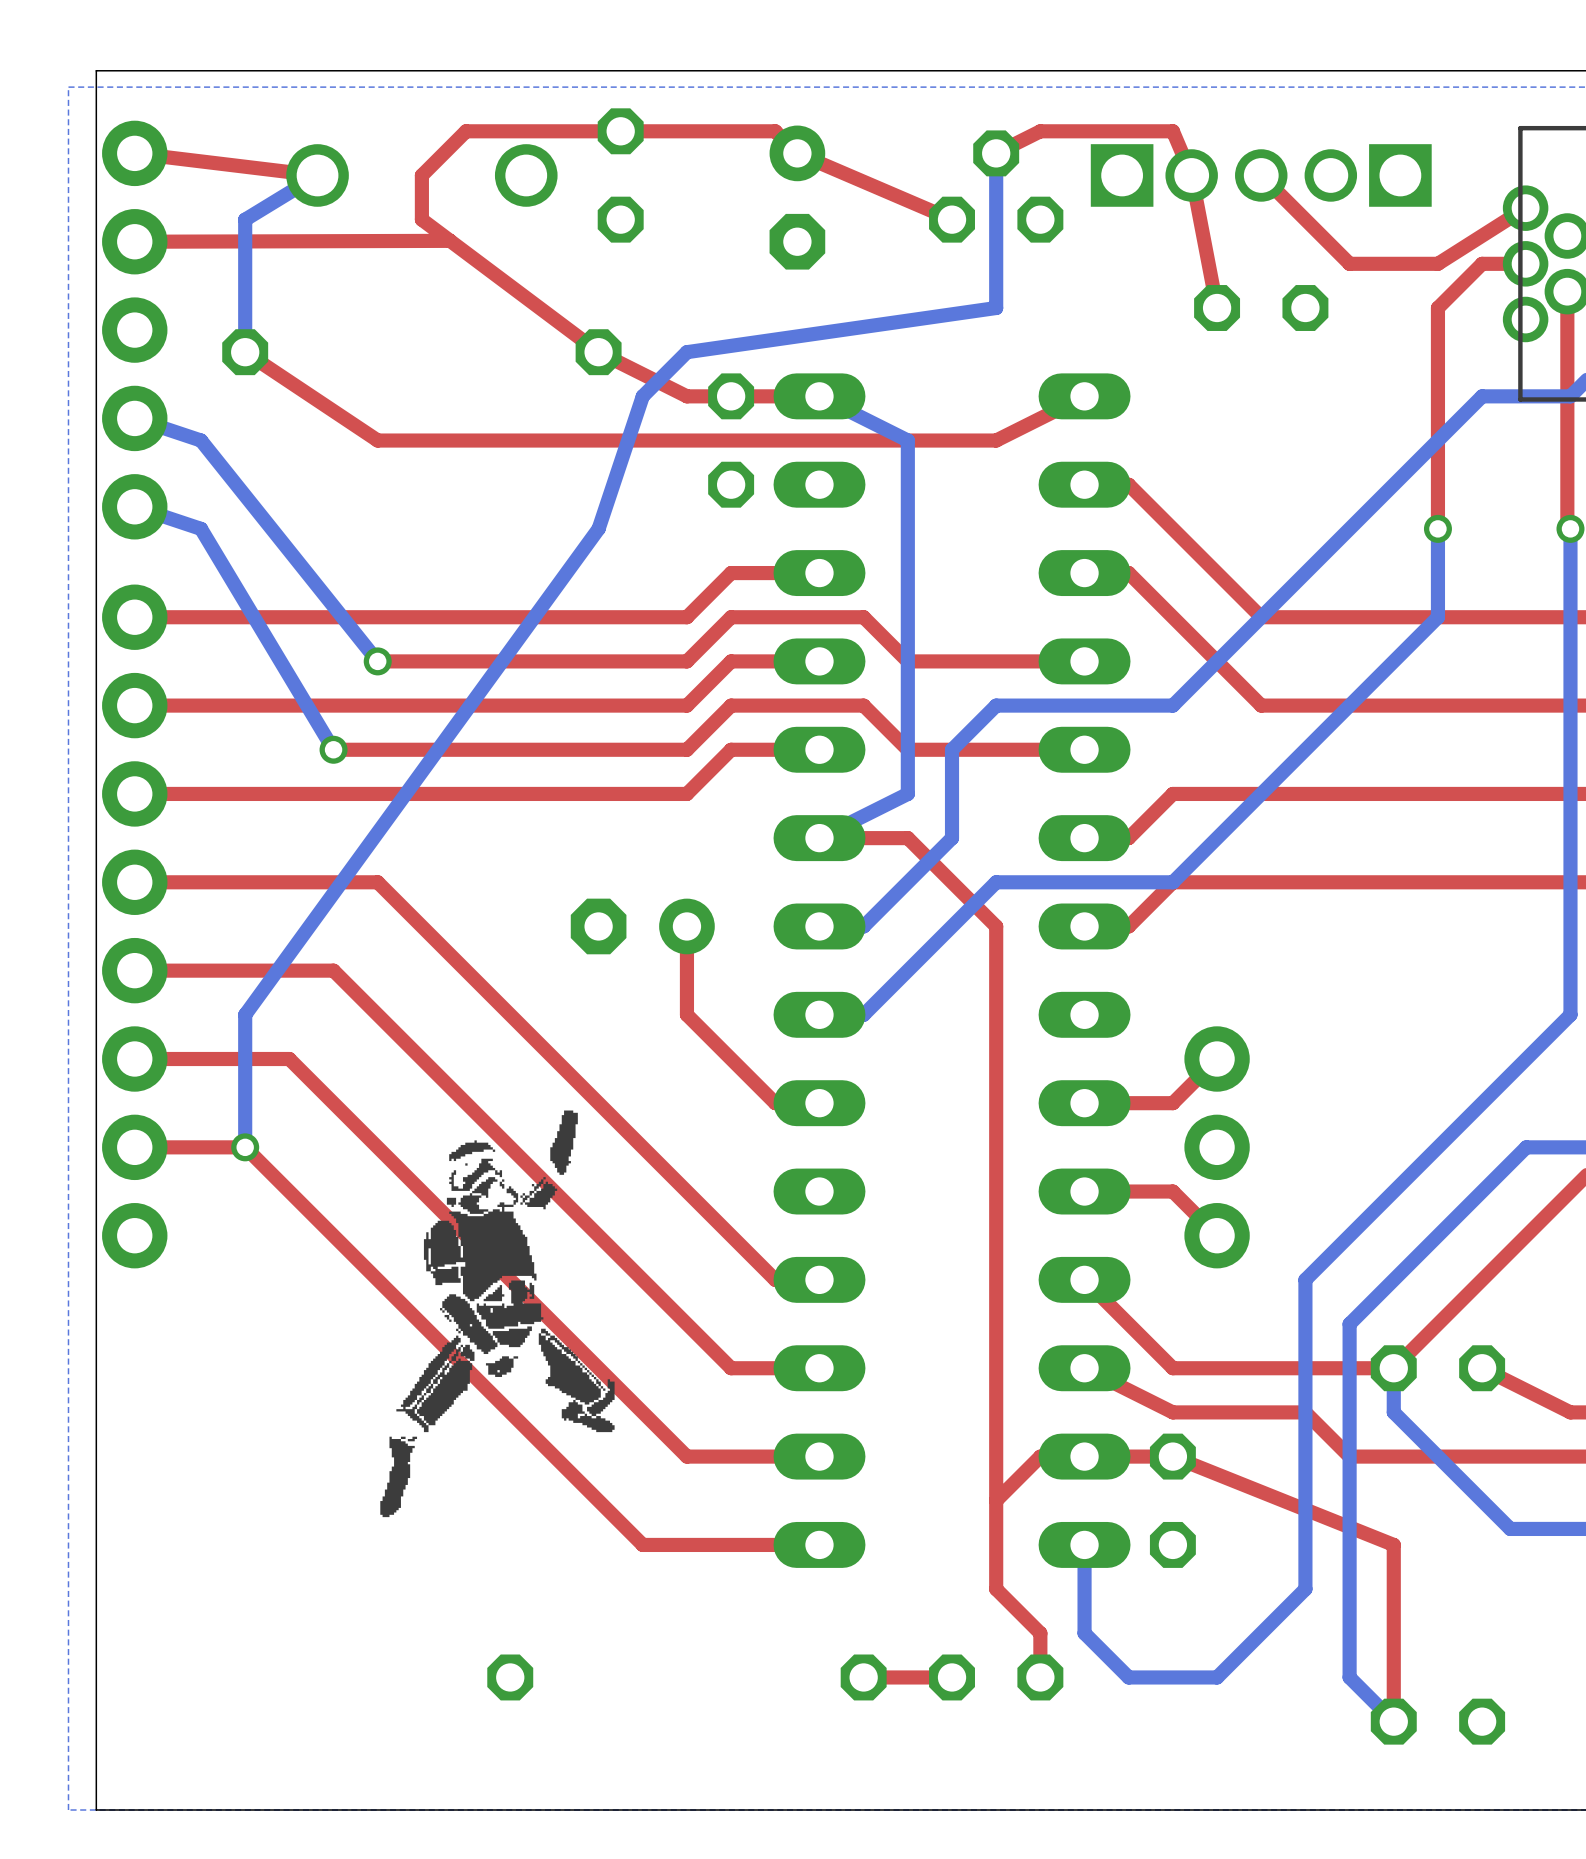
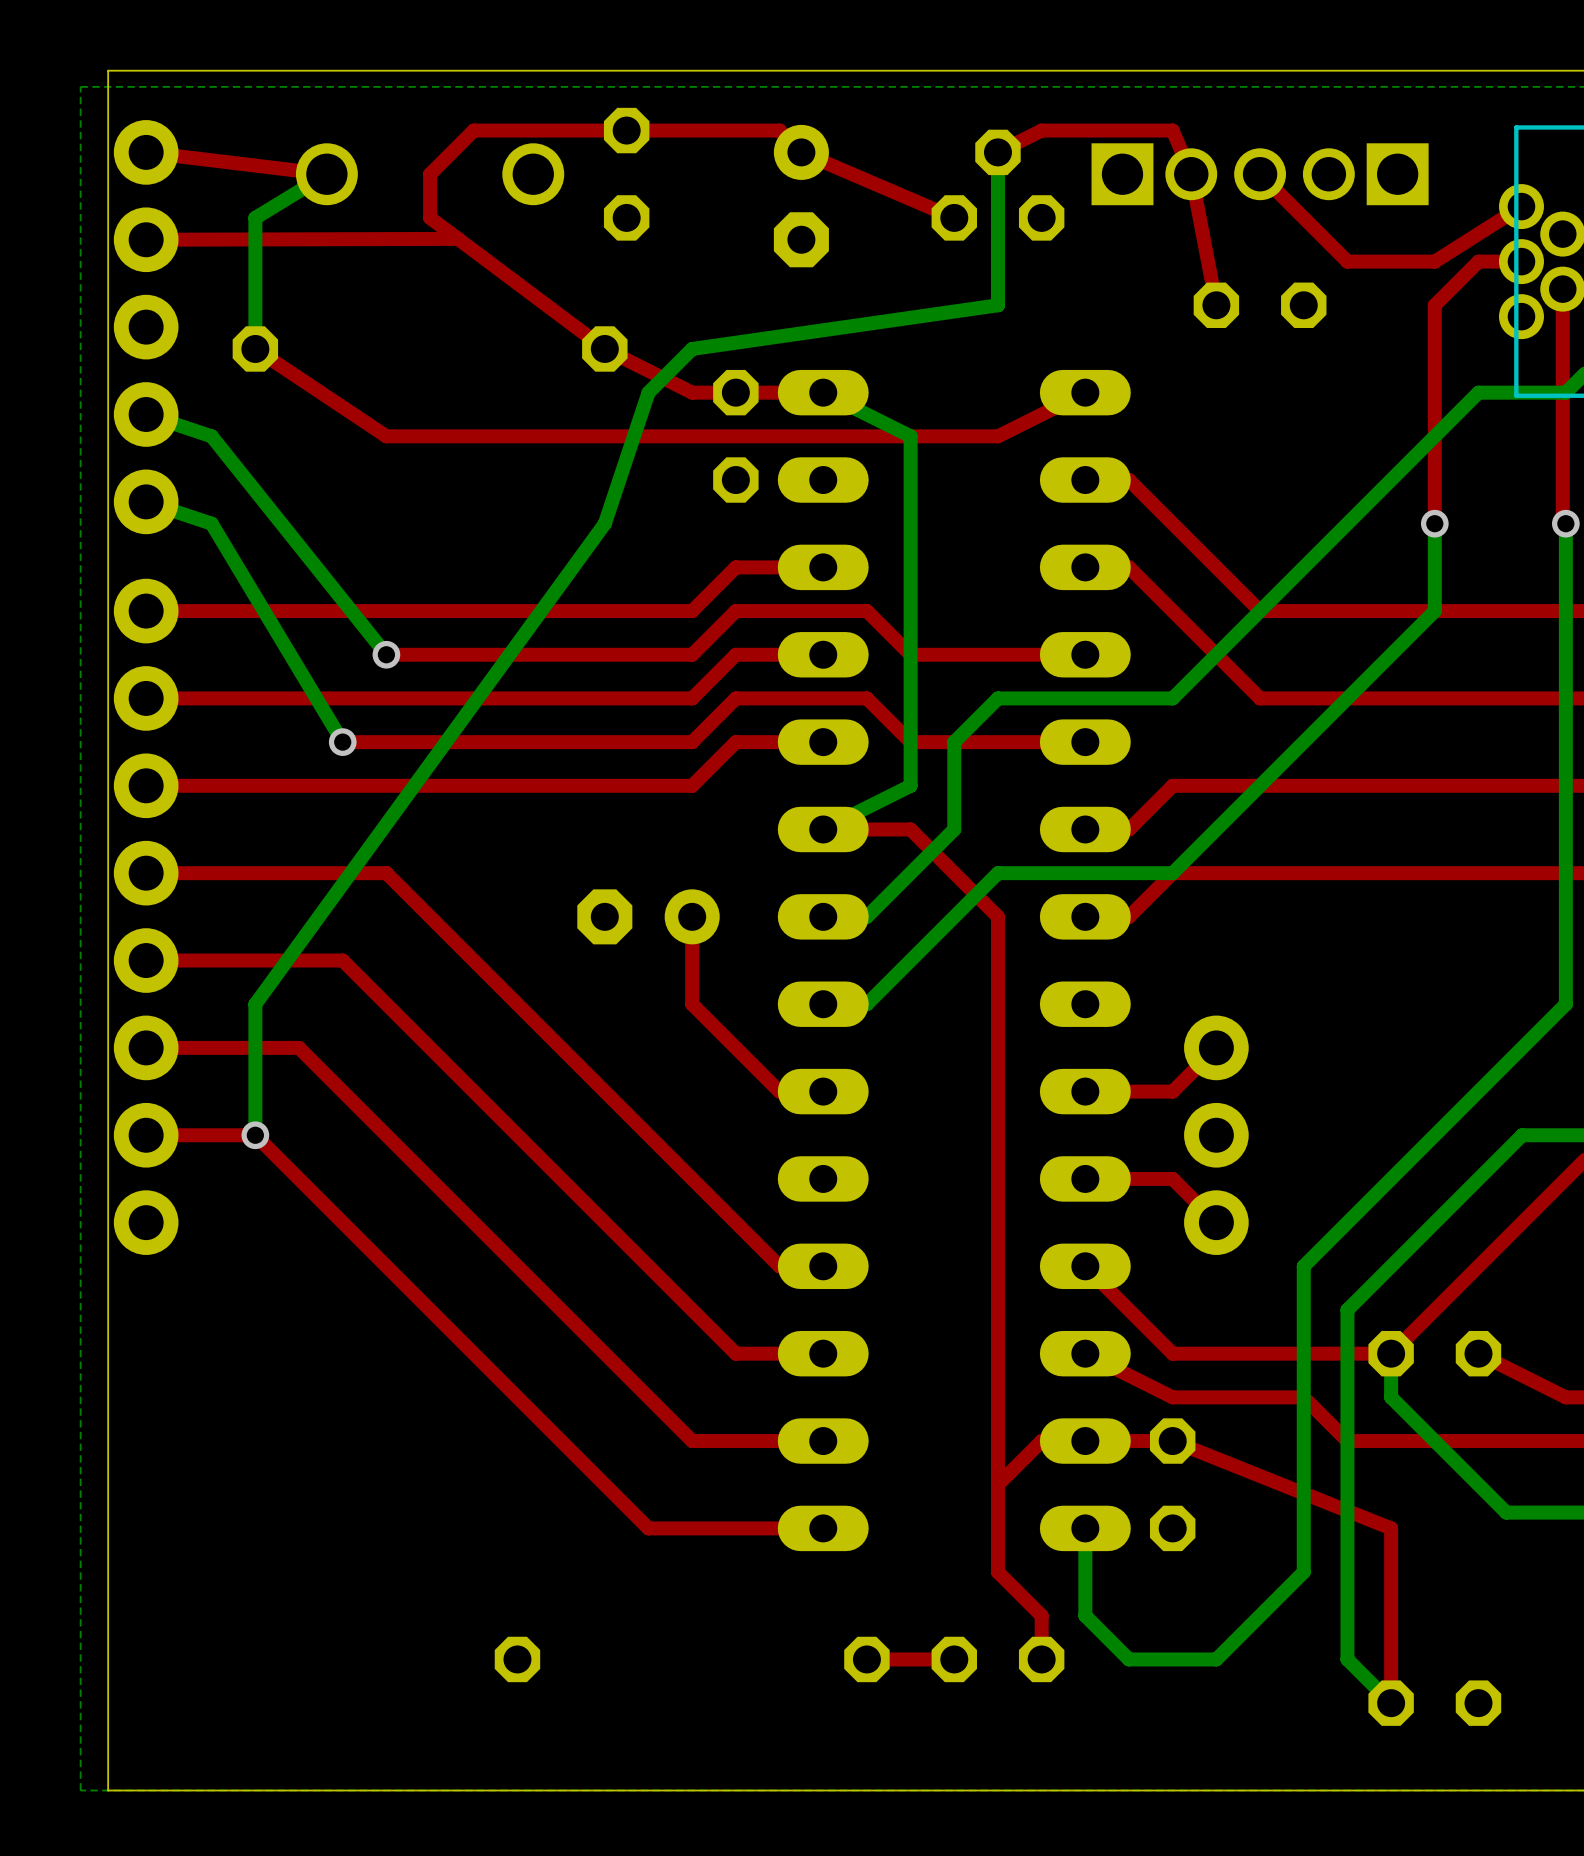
drawing: [380, 1110, 615, 1518] -> none

